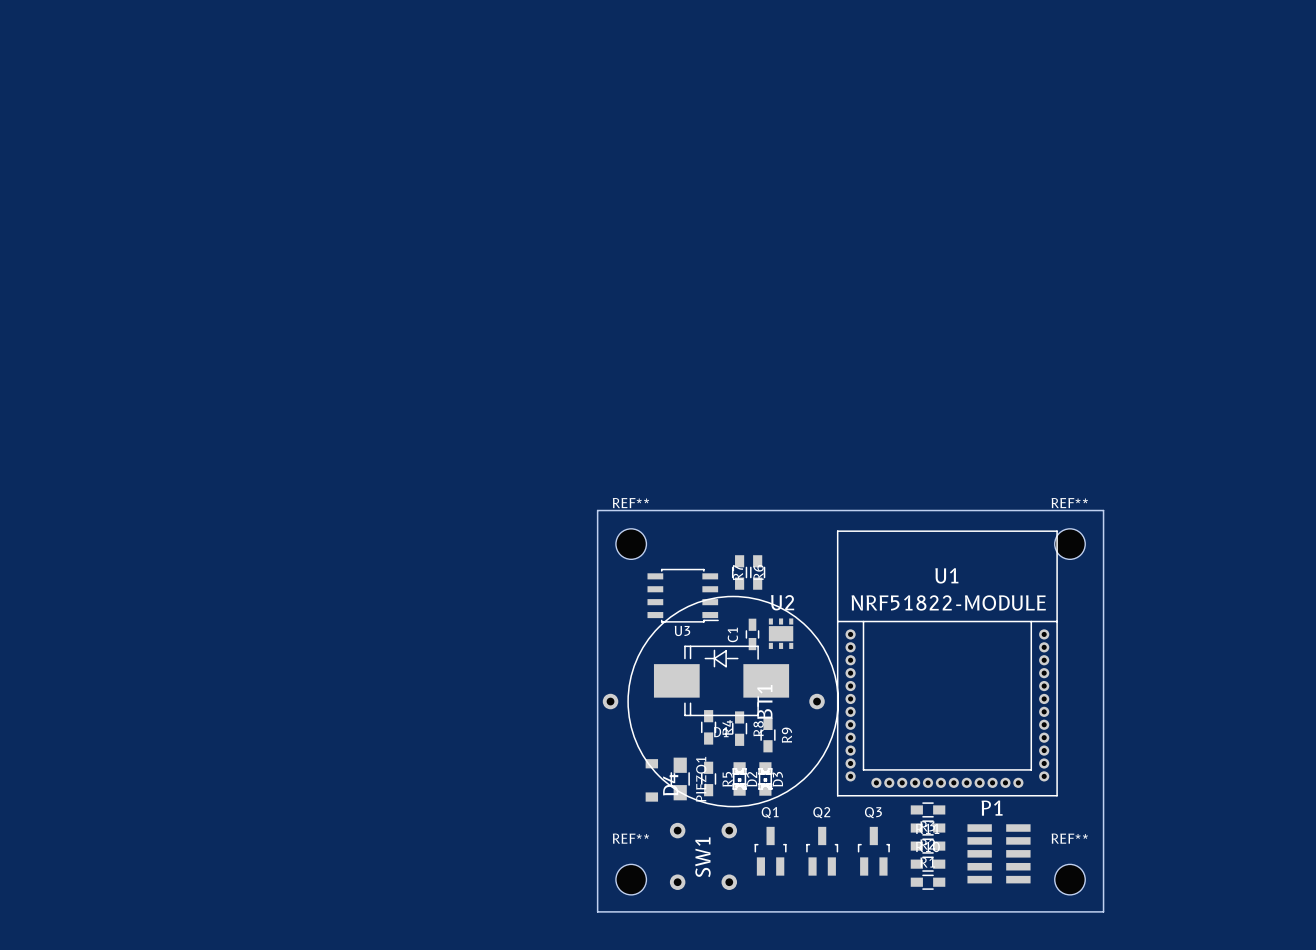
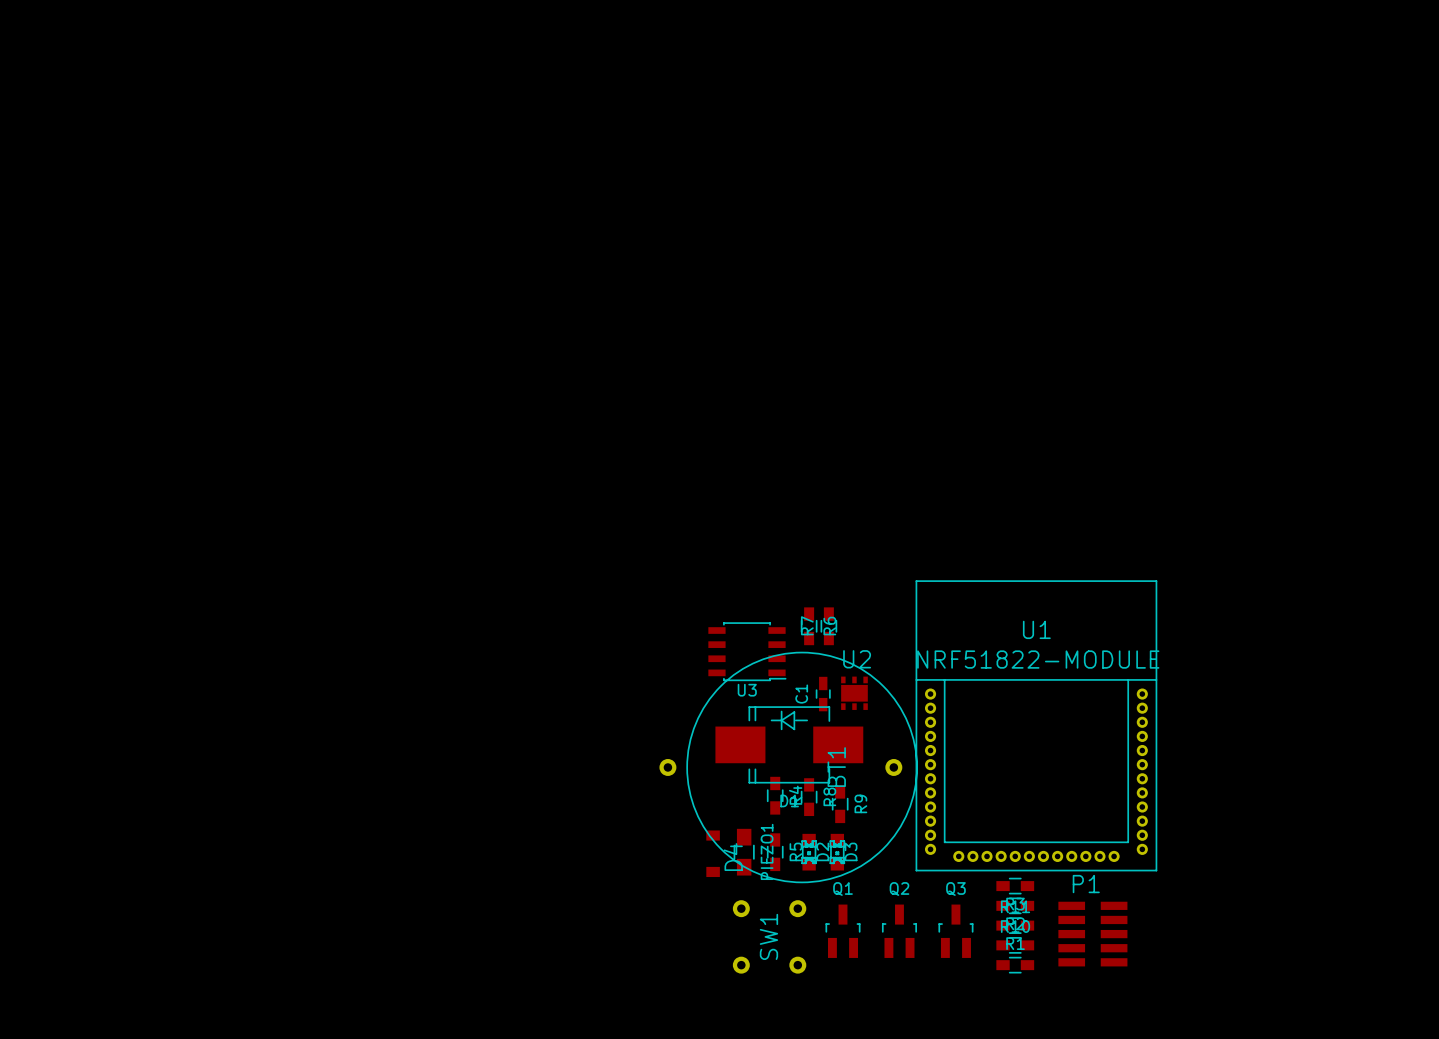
board edge: (597, 510) (1103, 510) (1103, 911) (597, 911) (597, 510) -> none
REF**: (631, 544) -> none
REF**: (1069, 544) -> none
REF**: (631, 879) -> none
REF**: (1069, 879) -> none

